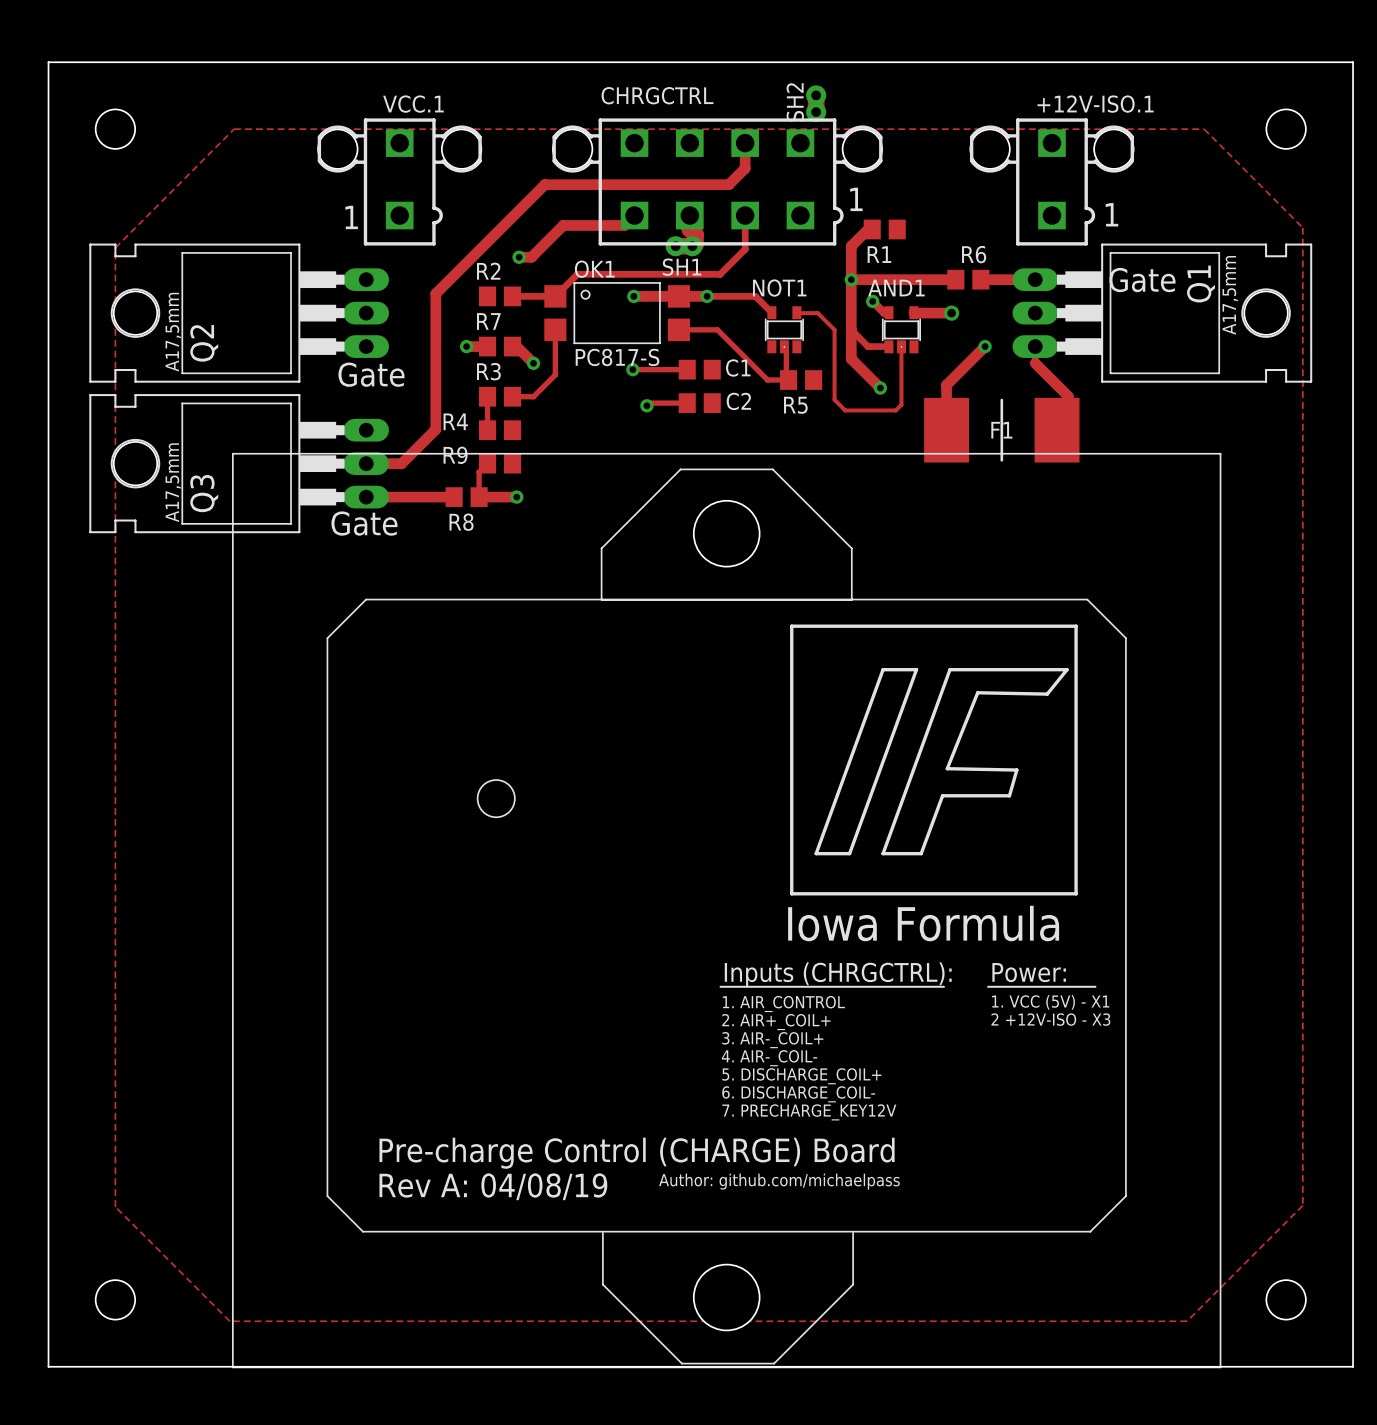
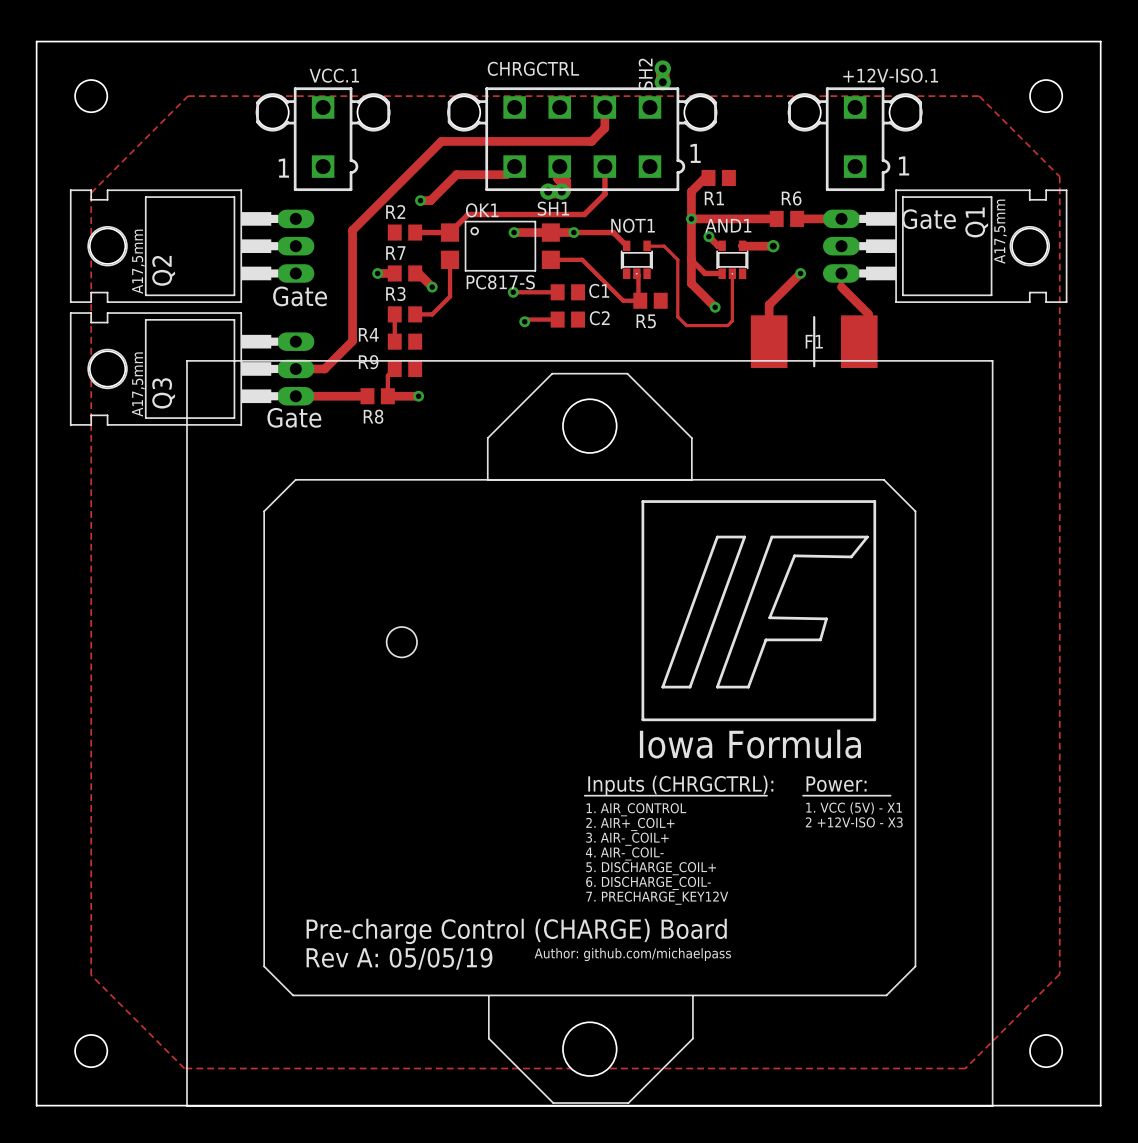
text: Rev A: 04/08/19 (493, 1186) -> Rev A: 05/05/19 (399, 958)

